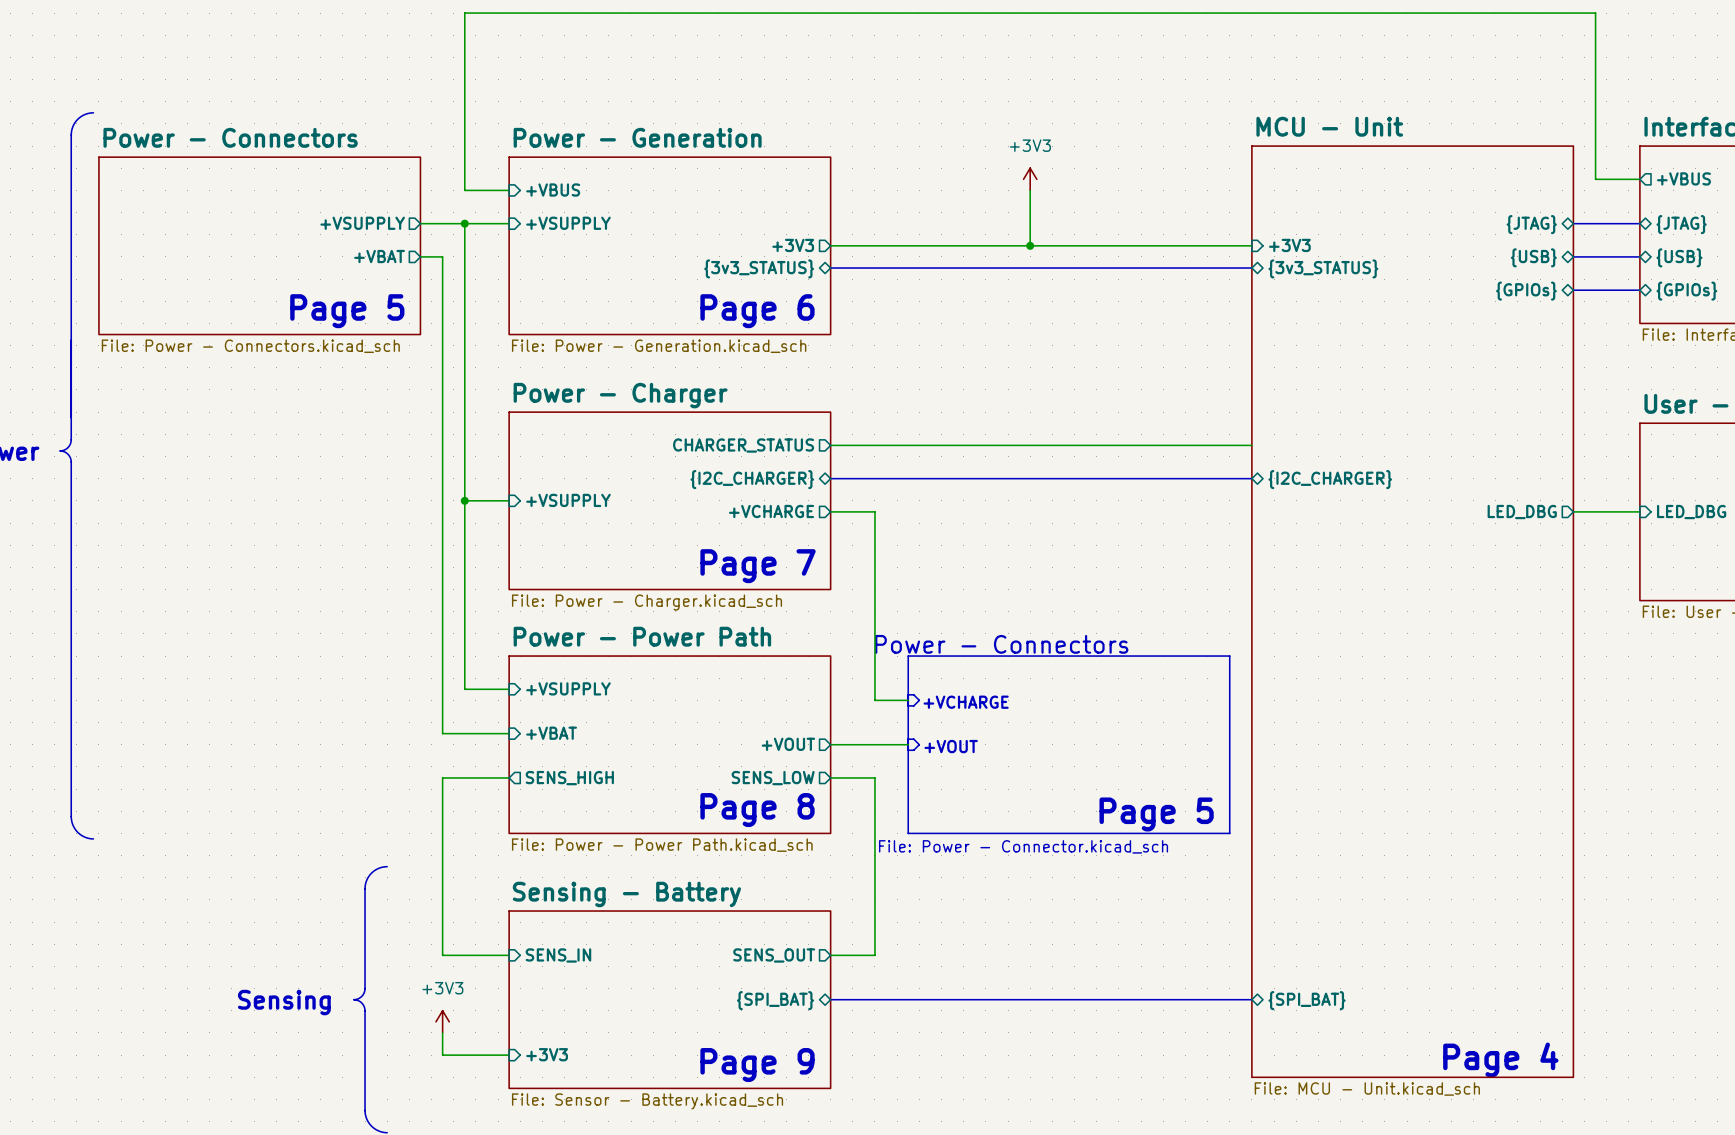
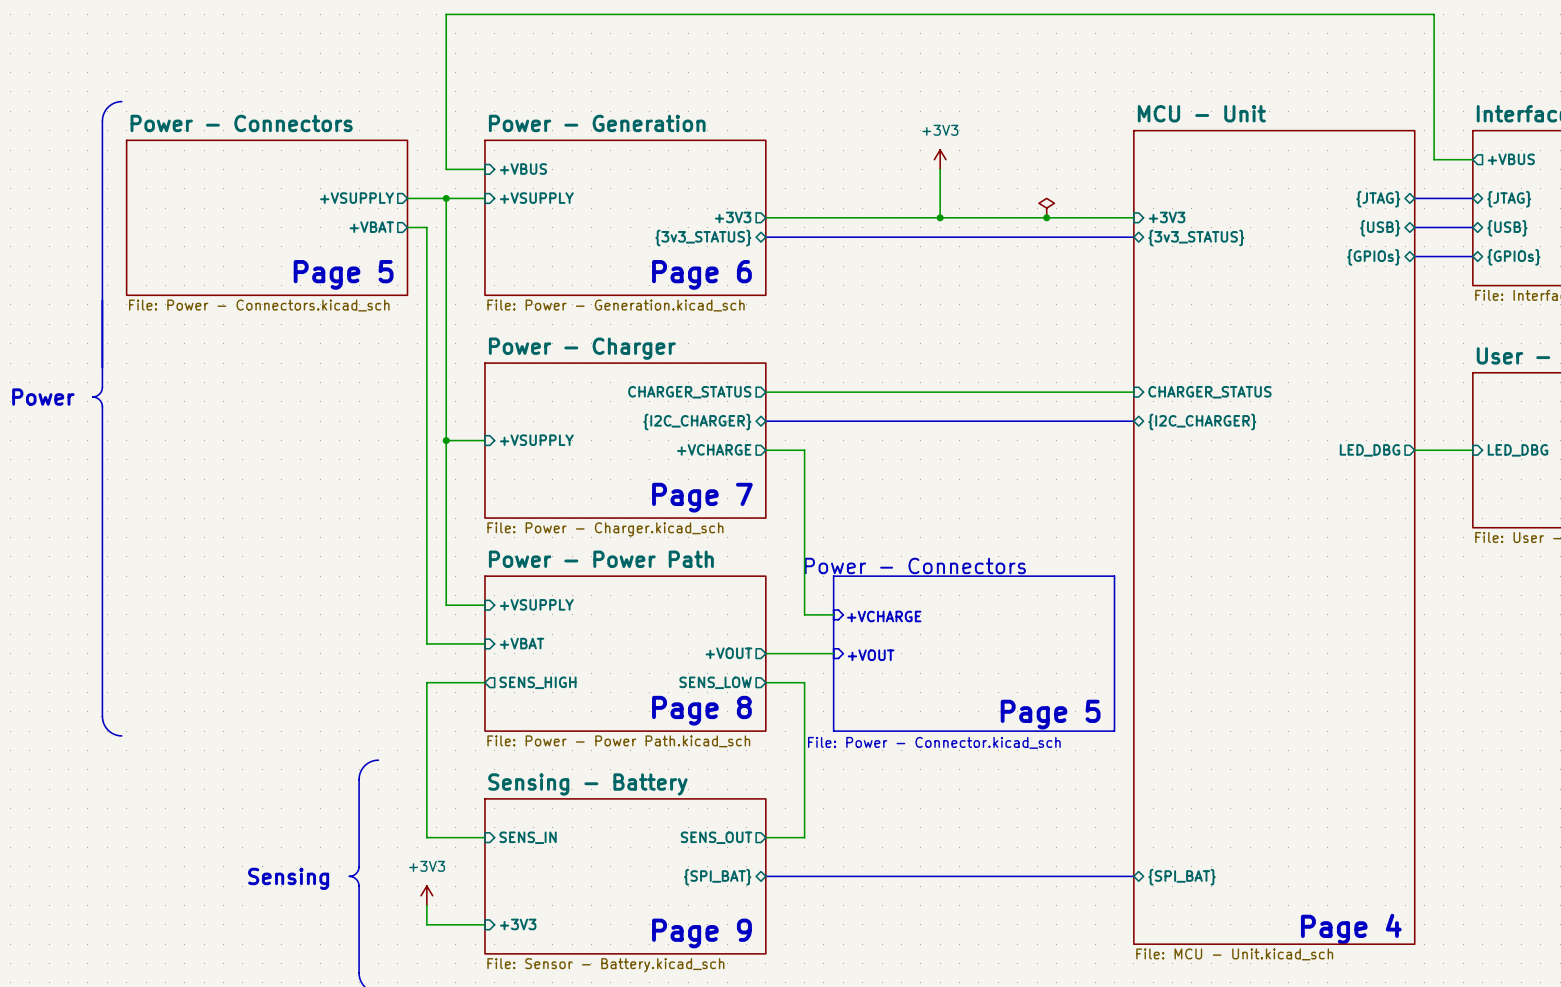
power symbol: none -> (1046, 208)
junction: none -> (1046, 217)
sheet pin: none -> CHARGER_STATUS (1209, 392)

